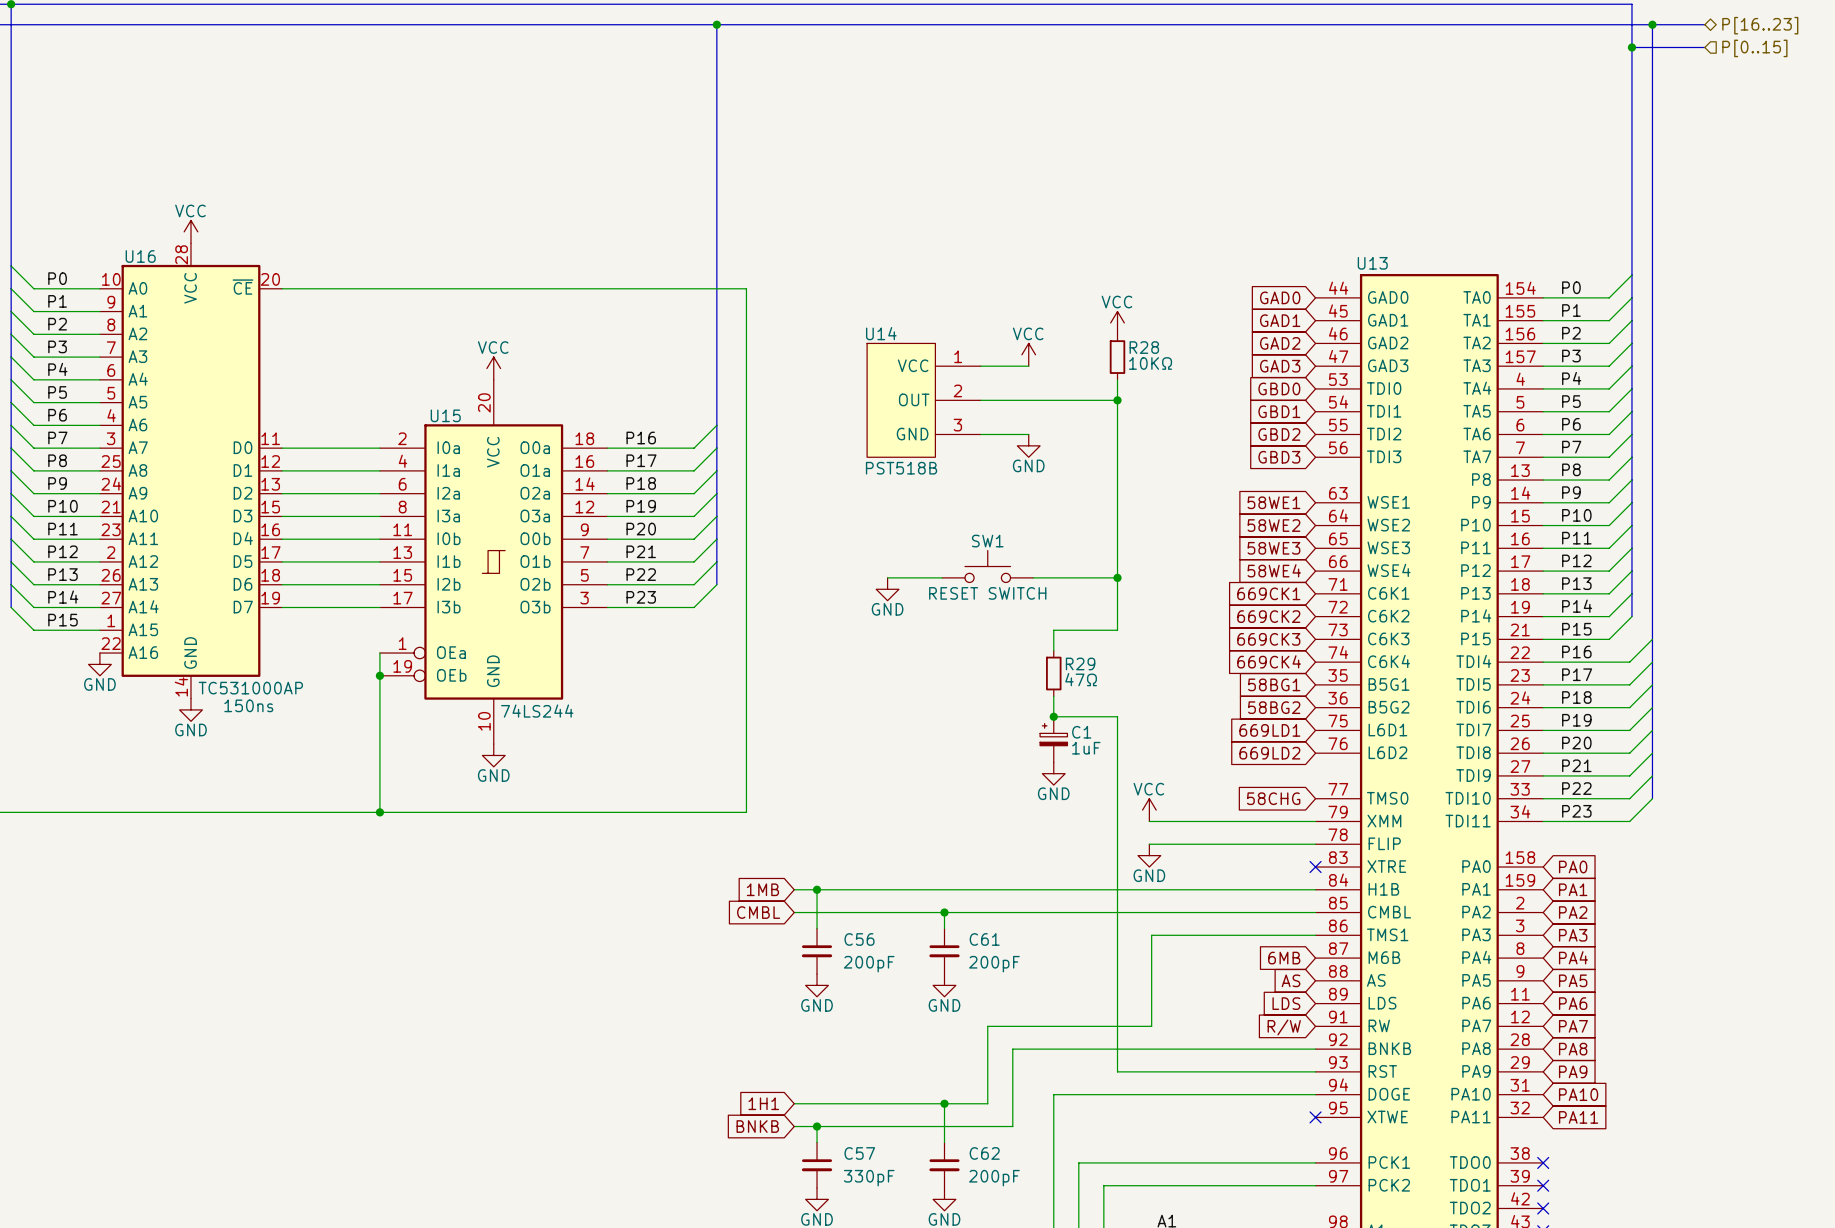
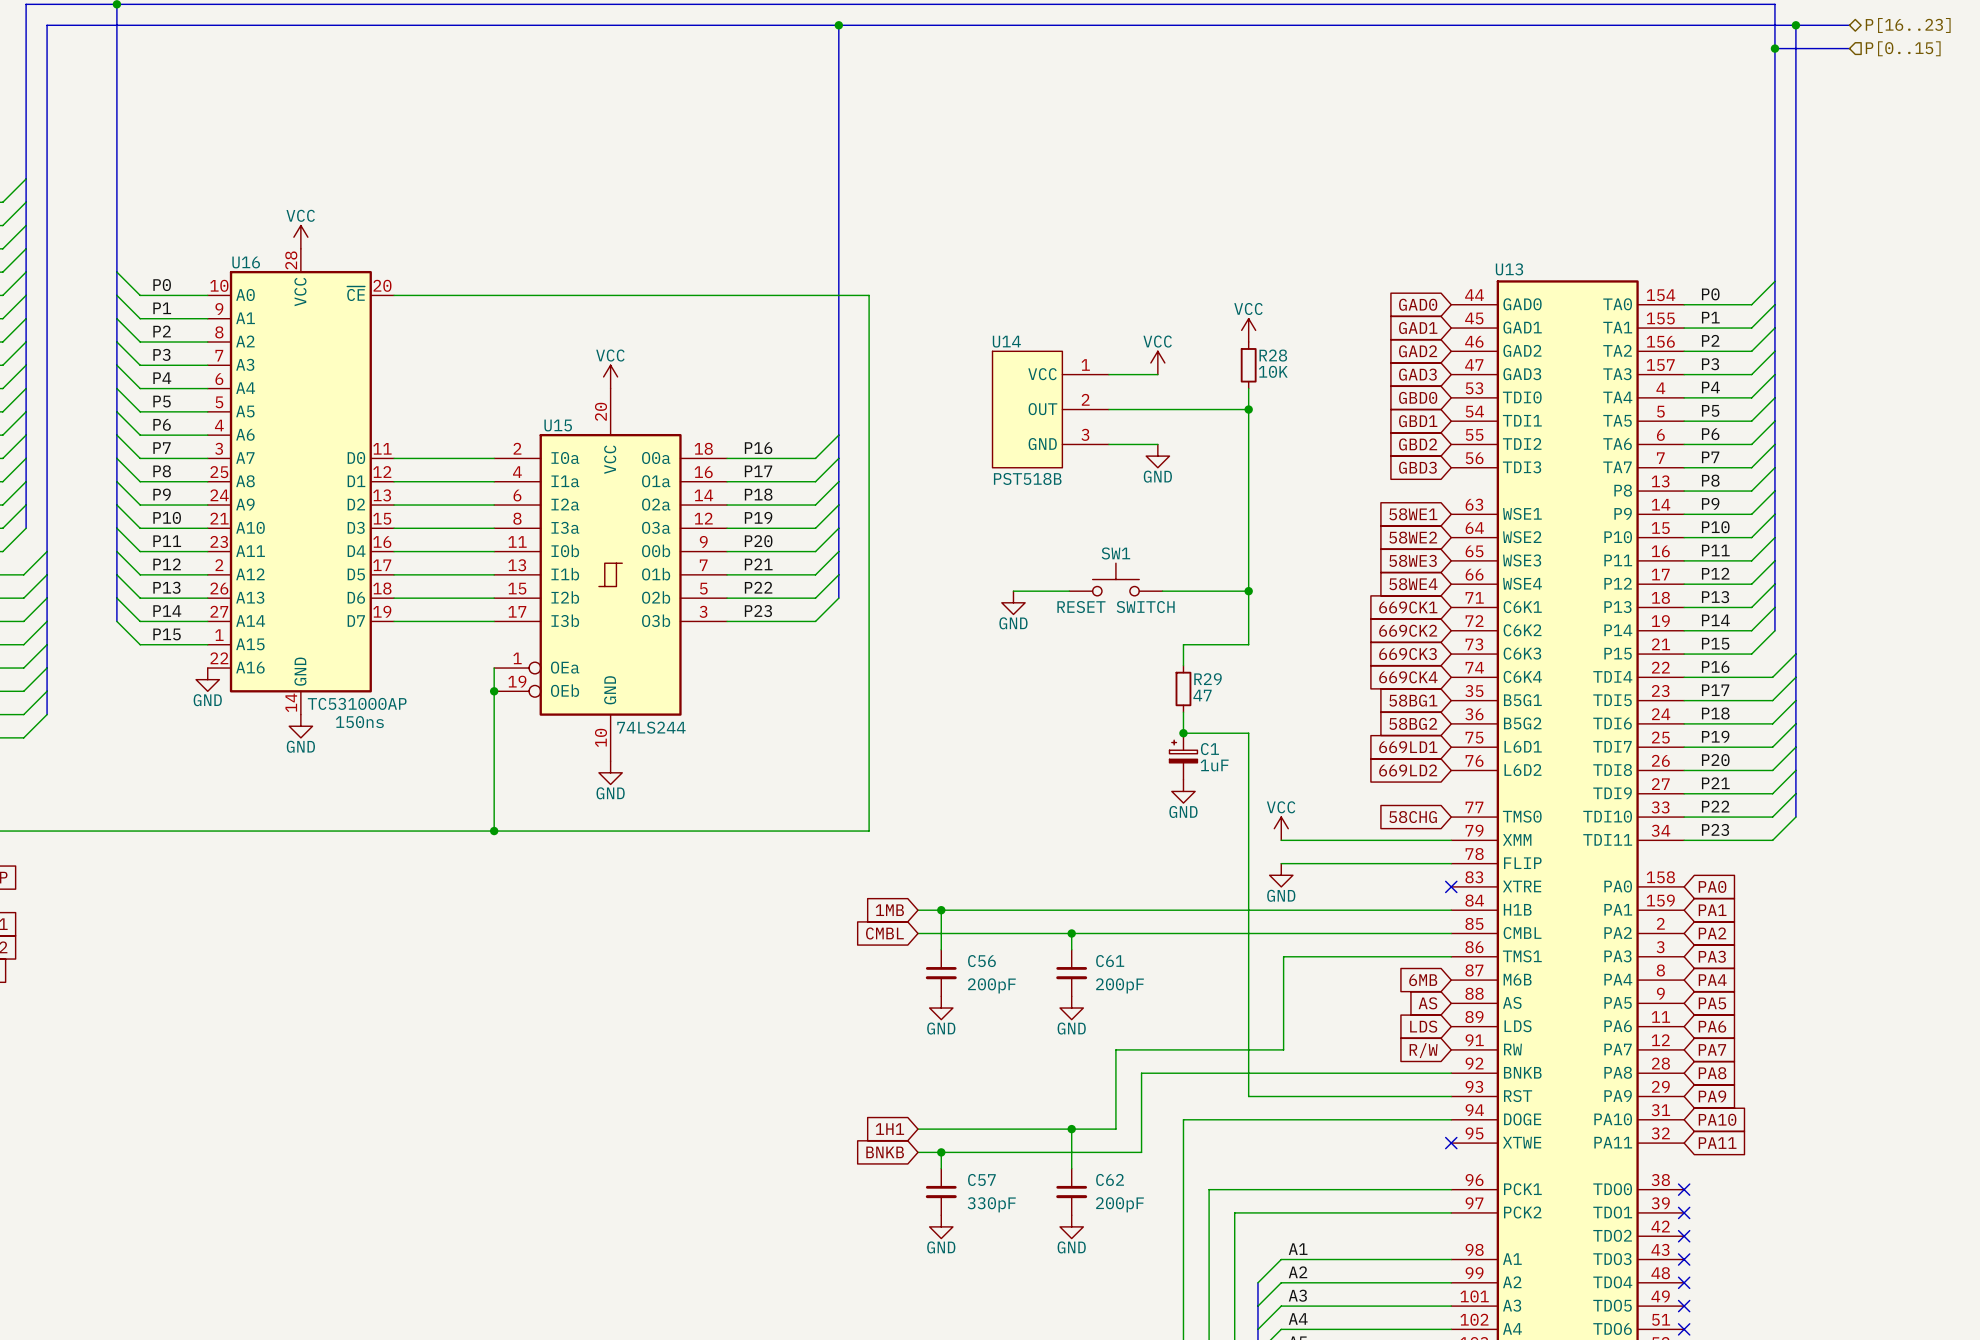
R28 value: 10KΩ (1150, 363) -> 10K (1273, 371)
R29 value: 47Ω (1081, 679) -> 47 (1202, 695)

